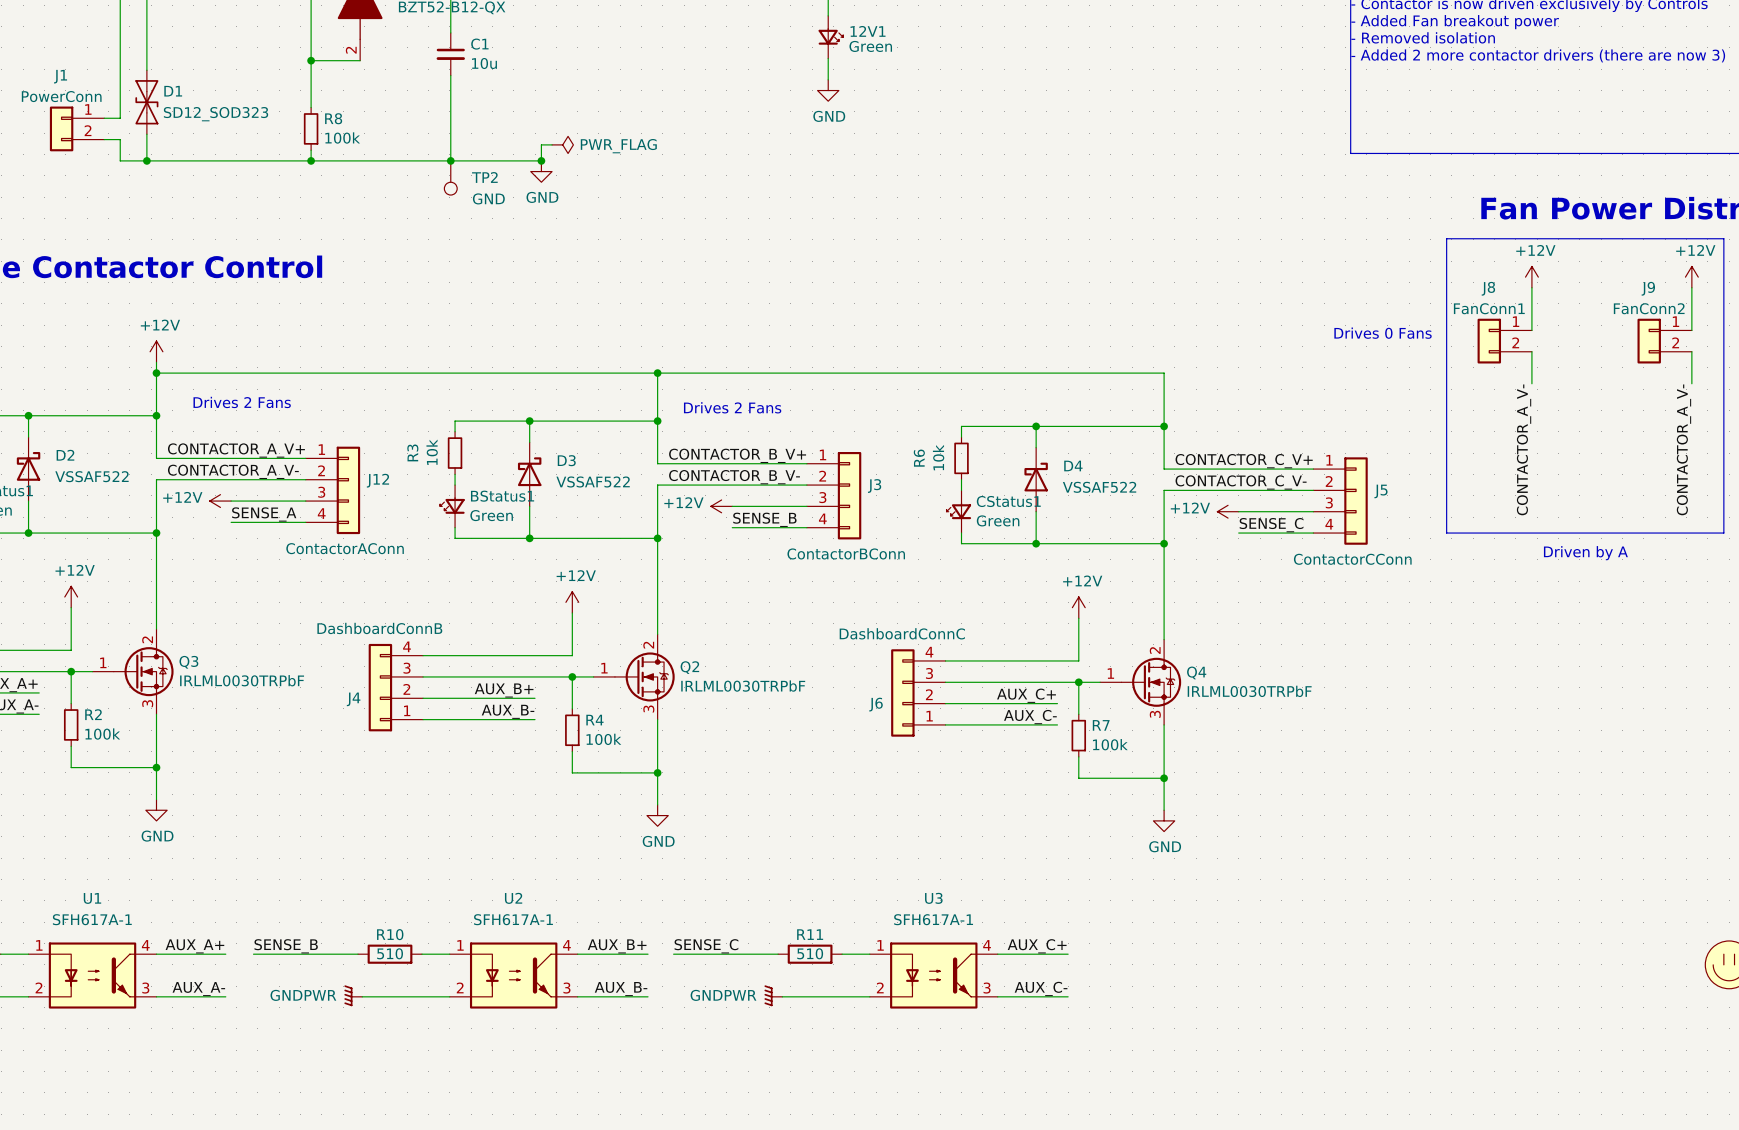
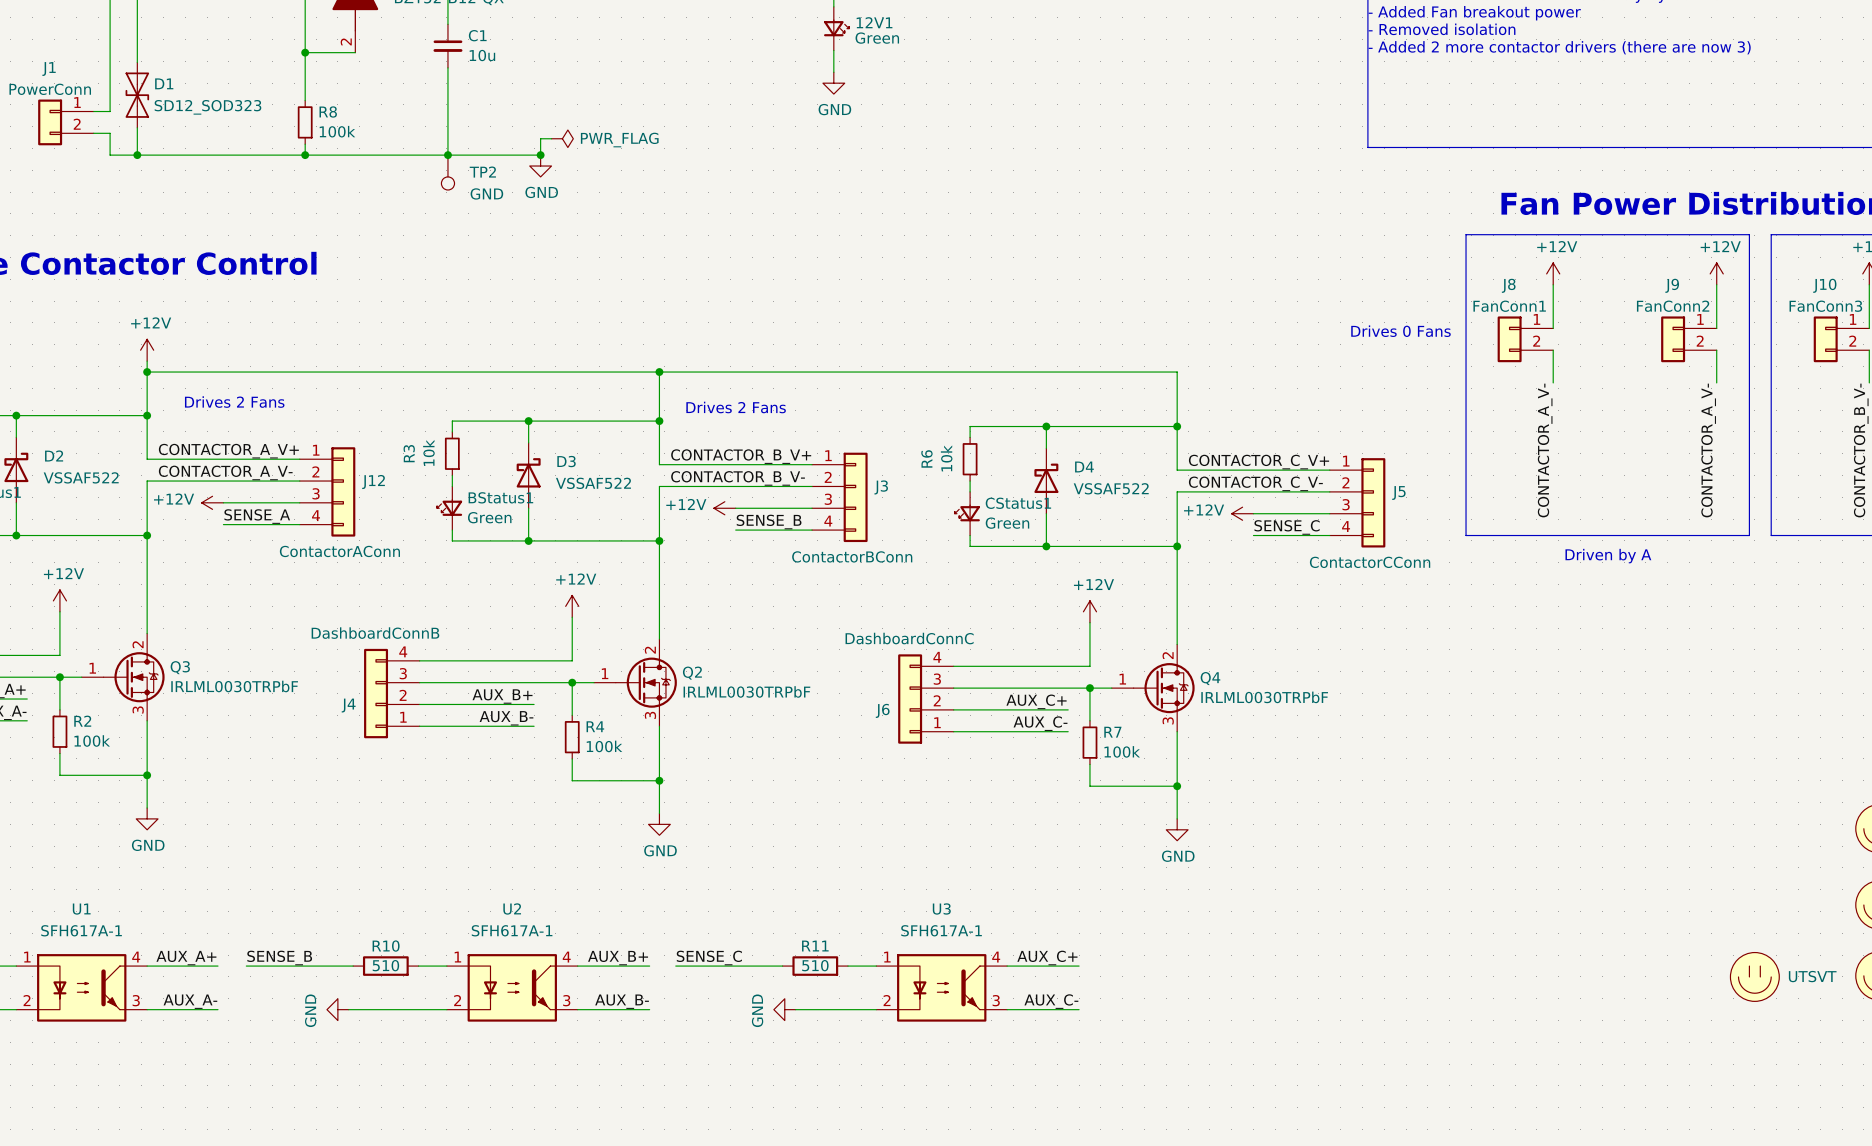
power symbol: GNDPWR (353, 995) -> none
power symbol: GNDPWR (773, 995) -> GND (784, 1009)
power symbol: none -> GND (337, 1009)

